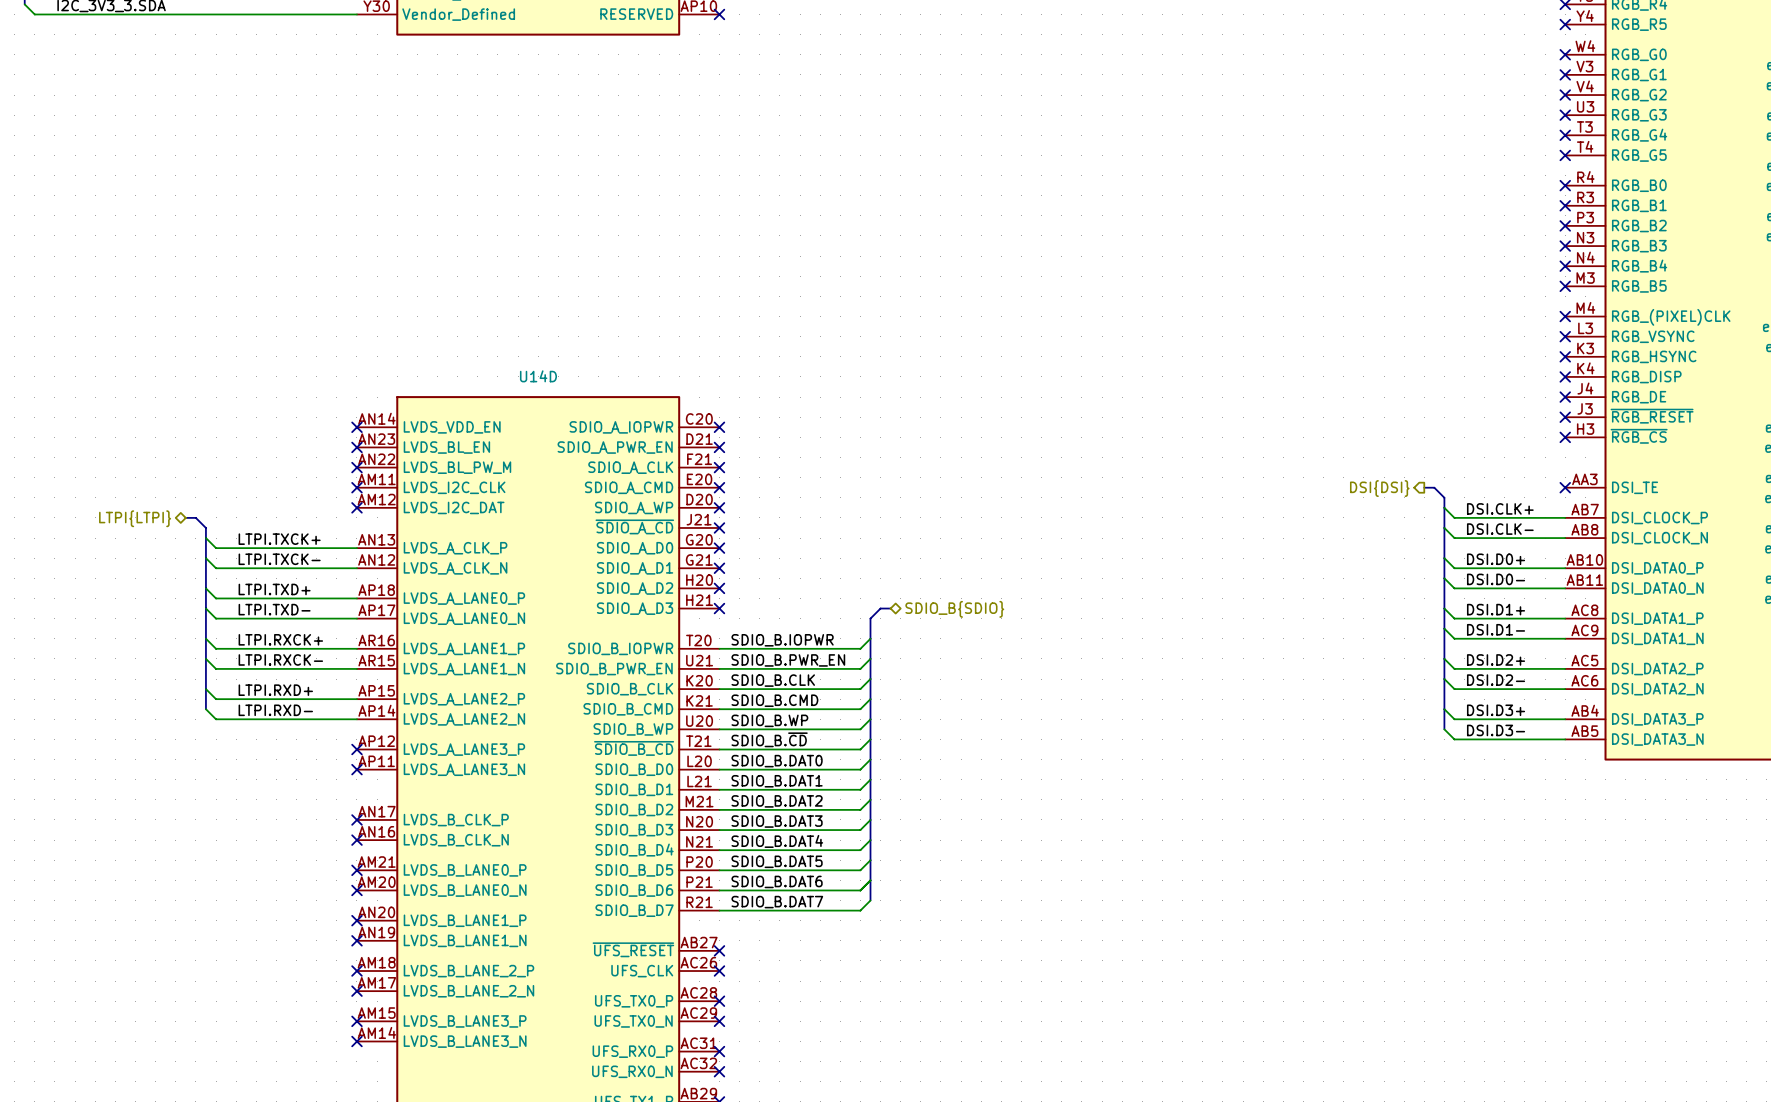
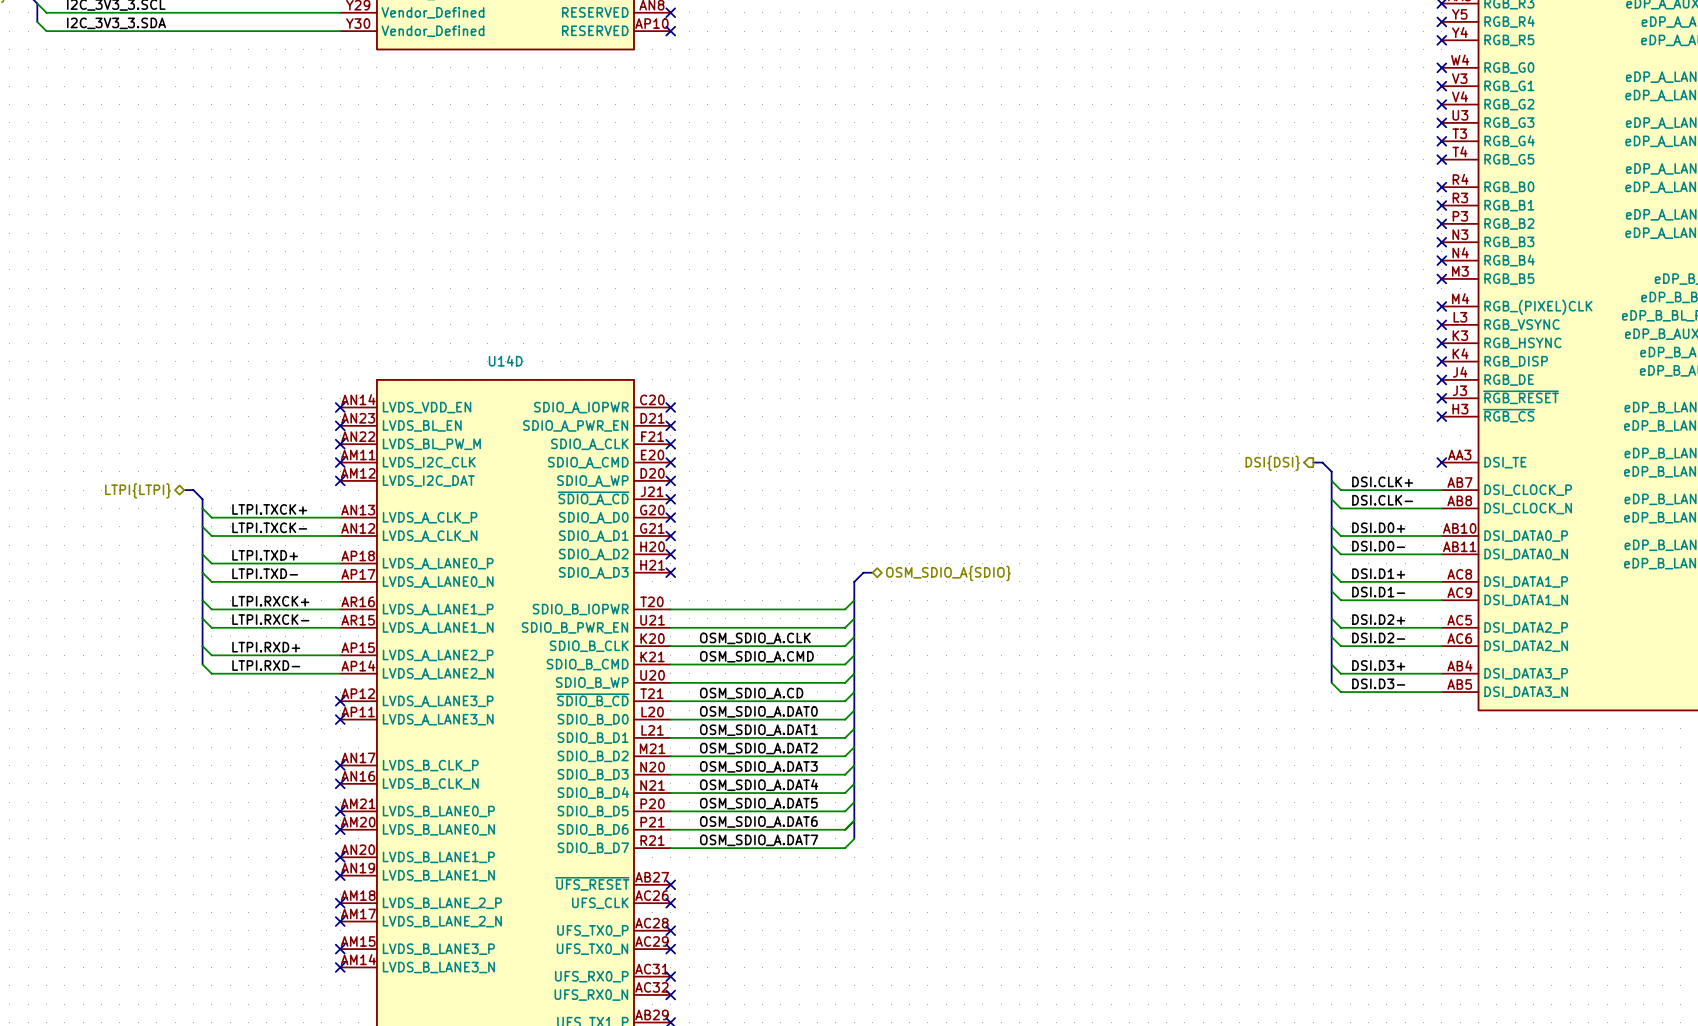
bus: (890, 608) (880, 608) (870, 618) (870, 900) -> (872, 572) (863, 572) (854, 581) (854, 838)
hierarchical label: SDIO_B{SDIO} (954, 609) -> OSM_SDIO_A{SDIO} (948, 573)
wire: (870, 638) (860, 648) -> (854, 600) (845, 609) (799, 609)
label: SDIO_B.IOPWR (782, 640) -> none
wire: (870, 658) (860, 668) -> (854, 618) (845, 627) (799, 627)
label: SDIO_B.PWR_EN (788, 660) -> none
wire: (870, 679) (860, 689) -> (854, 636) (845, 646) (799, 646)
label: SDIO_B.CLK (773, 680) -> OSM_SDIO_A.CLK (755, 638)
wire: (870, 699) (860, 709) -> (854, 655) (845, 664) (799, 664)
label: SDIO_B.CMD (774, 700) -> OSM_SDIO_A.CMD (756, 656)
wire: (870, 719) (860, 729) -> (854, 673) (845, 682) (799, 682)
label: SDIO_B.WP (769, 720) -> none
label: SDIO_B.~{CD} (769, 739) -> OSM_SDIO_A.CD (751, 693)
wire: (870, 739) (860, 749) -> (854, 692) (845, 701) (799, 701)
wire: (870, 759) (860, 769) -> (854, 710) (845, 719) (799, 719)
label: SDIO_B.DAT0 (777, 761) -> none
label: none -> OSM_SDIO_A.DAT0 (758, 711)
wire: (870, 779) (860, 789) -> (854, 728) (845, 737) (799, 737)
label: SDIO_B.DAT1 (777, 781) -> none
label: none -> OSM_SDIO_A.DAT1 (758, 730)
wire: (870, 799) (860, 809) -> (854, 747) (845, 756) (799, 756)
label: SDIO_B.DAT2 (777, 801) -> none
label: none -> OSM_SDIO_A.DAT2 (758, 748)
wire: (870, 819) (860, 830) -> (854, 765) (845, 774) (799, 774)
label: SDIO_B.DAT3 (777, 821) -> none
label: none -> OSM_SDIO_A.DAT3 (758, 766)
wire: (870, 840) (860, 850) -> (854, 783) (845, 793) (799, 793)
label: SDIO_B.DAT4 (777, 841) -> none
label: none -> OSM_SDIO_A.DAT4 (759, 785)
wire: (870, 860) (860, 870) -> (854, 802) (845, 811) (799, 811)
label: SDIO_B.DAT5 (777, 861) -> none
label: none -> OSM_SDIO_A.DAT5 (758, 803)
wire: (870, 880) (860, 890) -> (854, 820) (845, 829) (799, 829)
label: SDIO_B.DAT6 (777, 881) -> none
label: none -> OSM_SDIO_A.DAT6 (758, 821)
wire: (870, 900) (860, 910) -> (854, 838) (845, 848) (799, 848)
label: SDIO_B.DAT7 (777, 902) -> none
label: none -> OSM_SDIO_A.DAT7 (759, 840)

